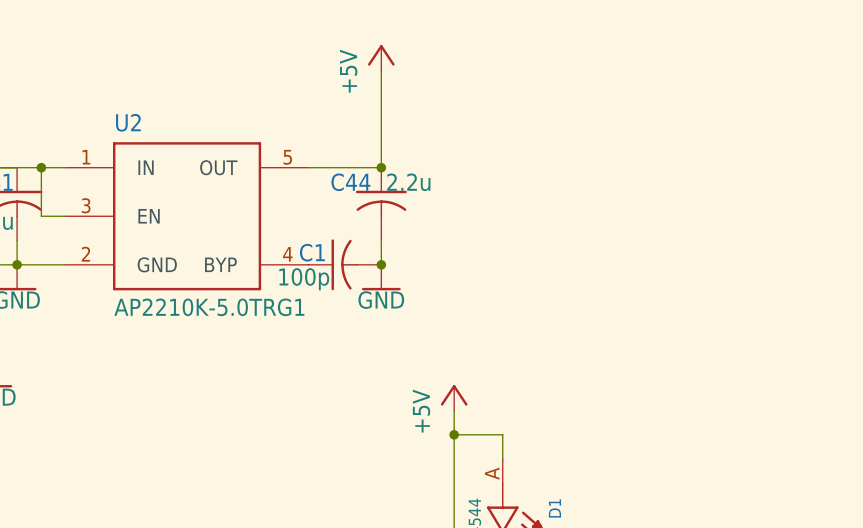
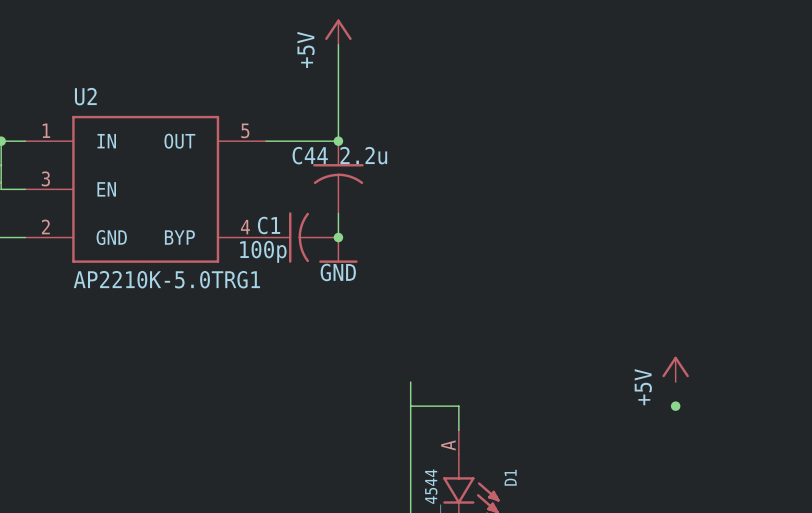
power symbol: +5V (454, 397) -> none
power symbol: none -> +5V (675, 369)
junction: (454, 434) -> none
junction: none -> (675, 406)

